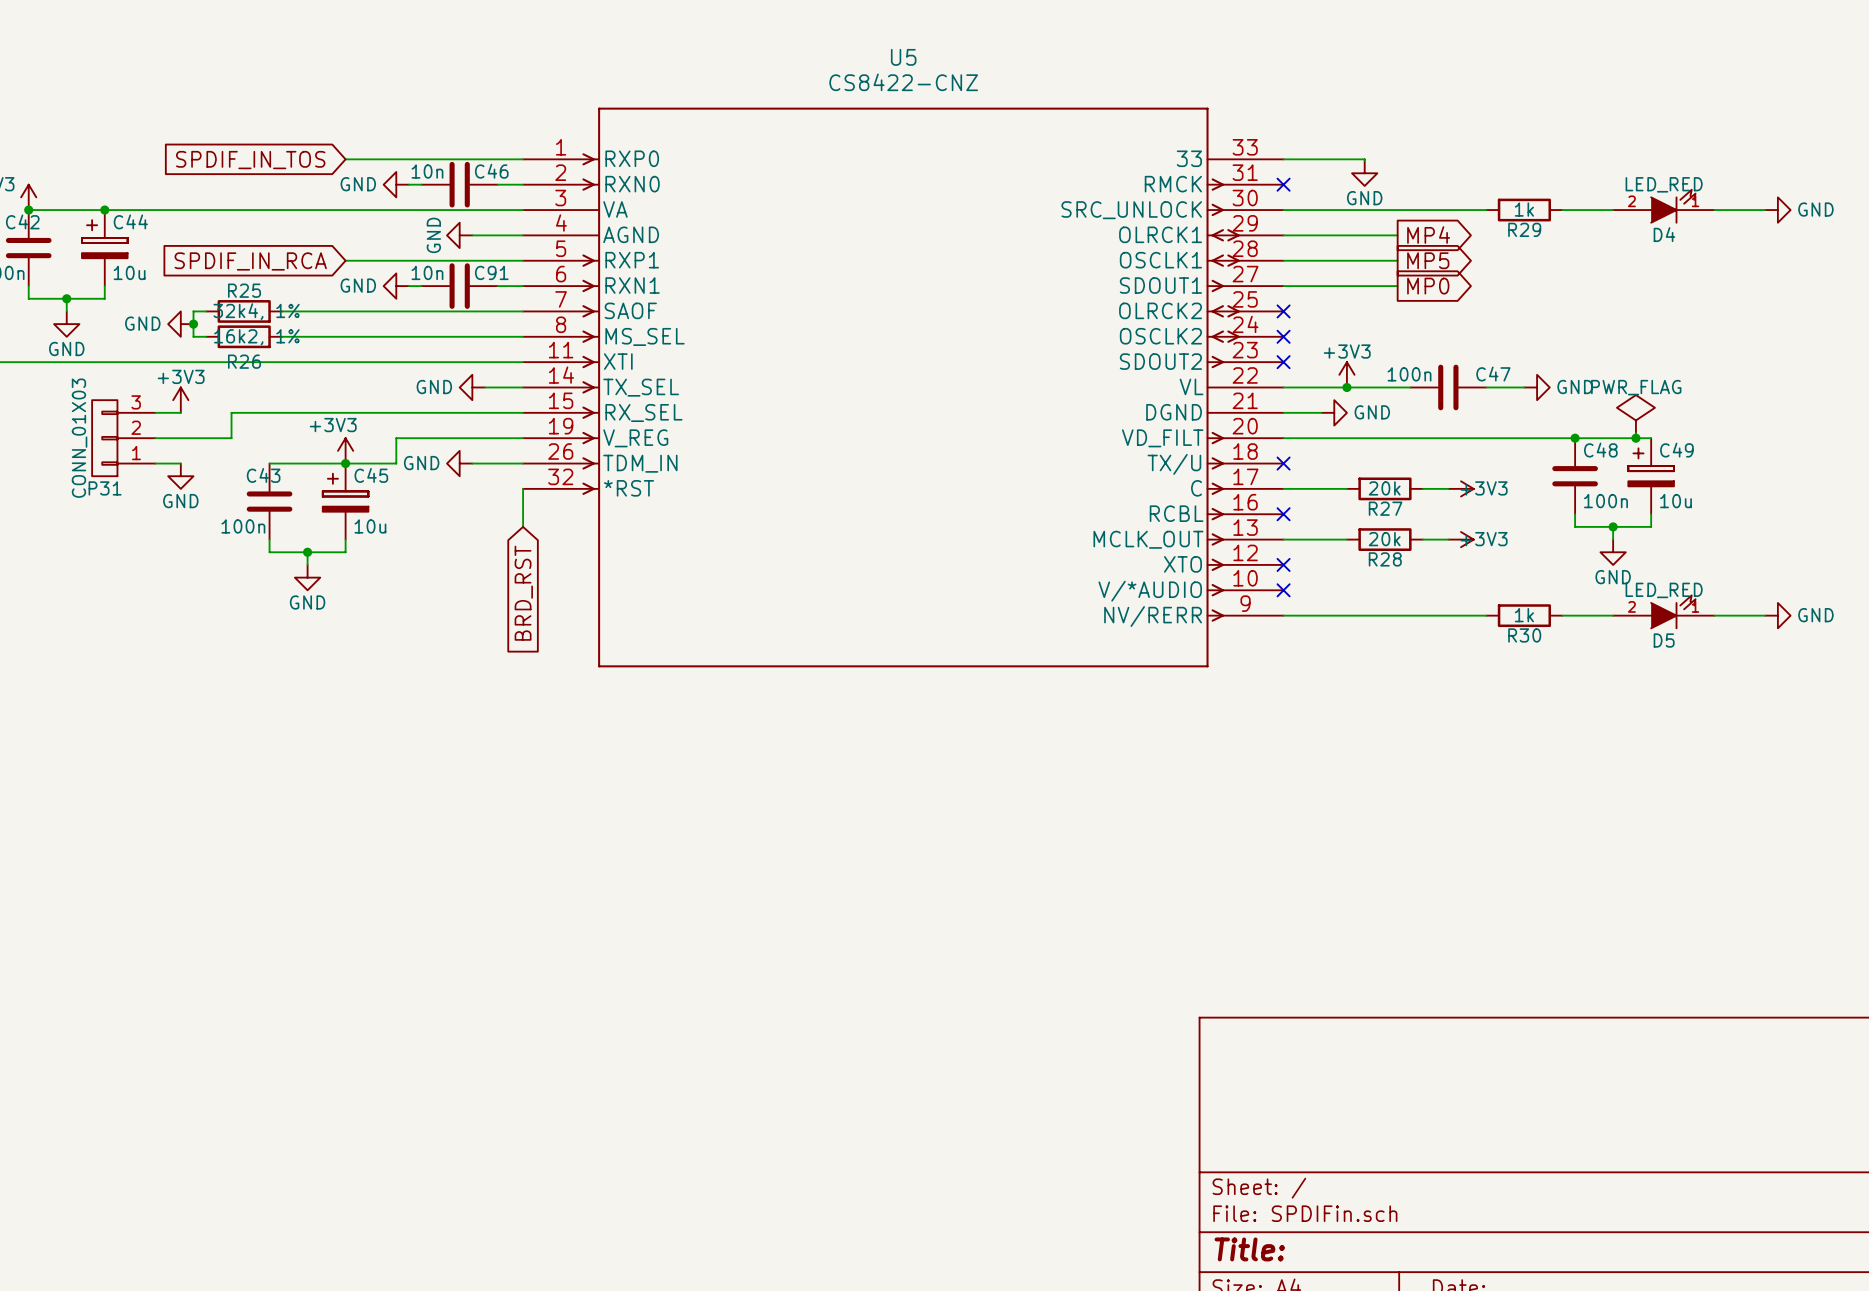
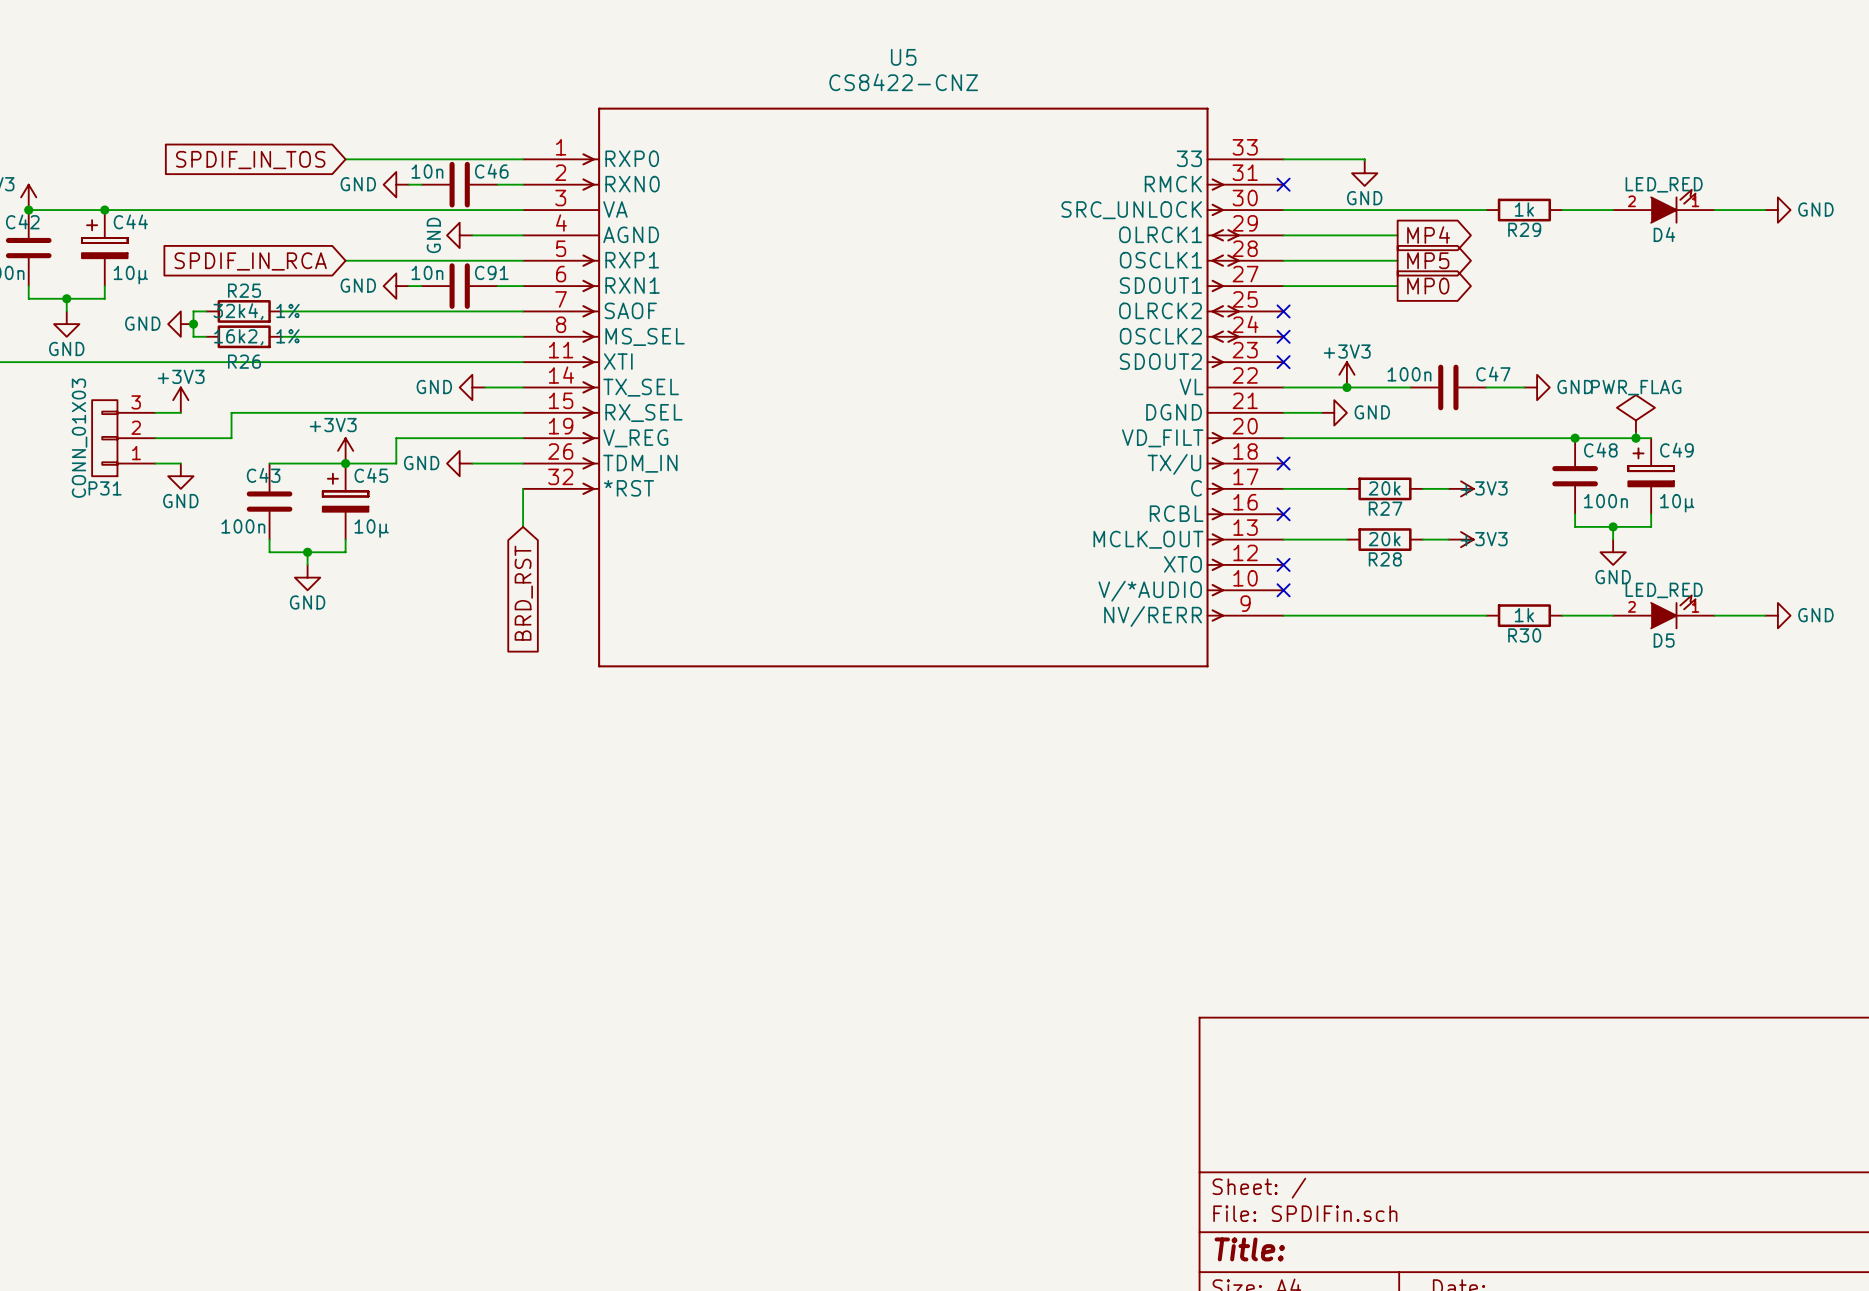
C44 value: 10u (129, 272) -> 10µ (130, 275)
C49 value: 10u (1676, 501) -> 10µ (1677, 503)
C45 value: 10u (370, 526) -> 10µ (371, 528)

